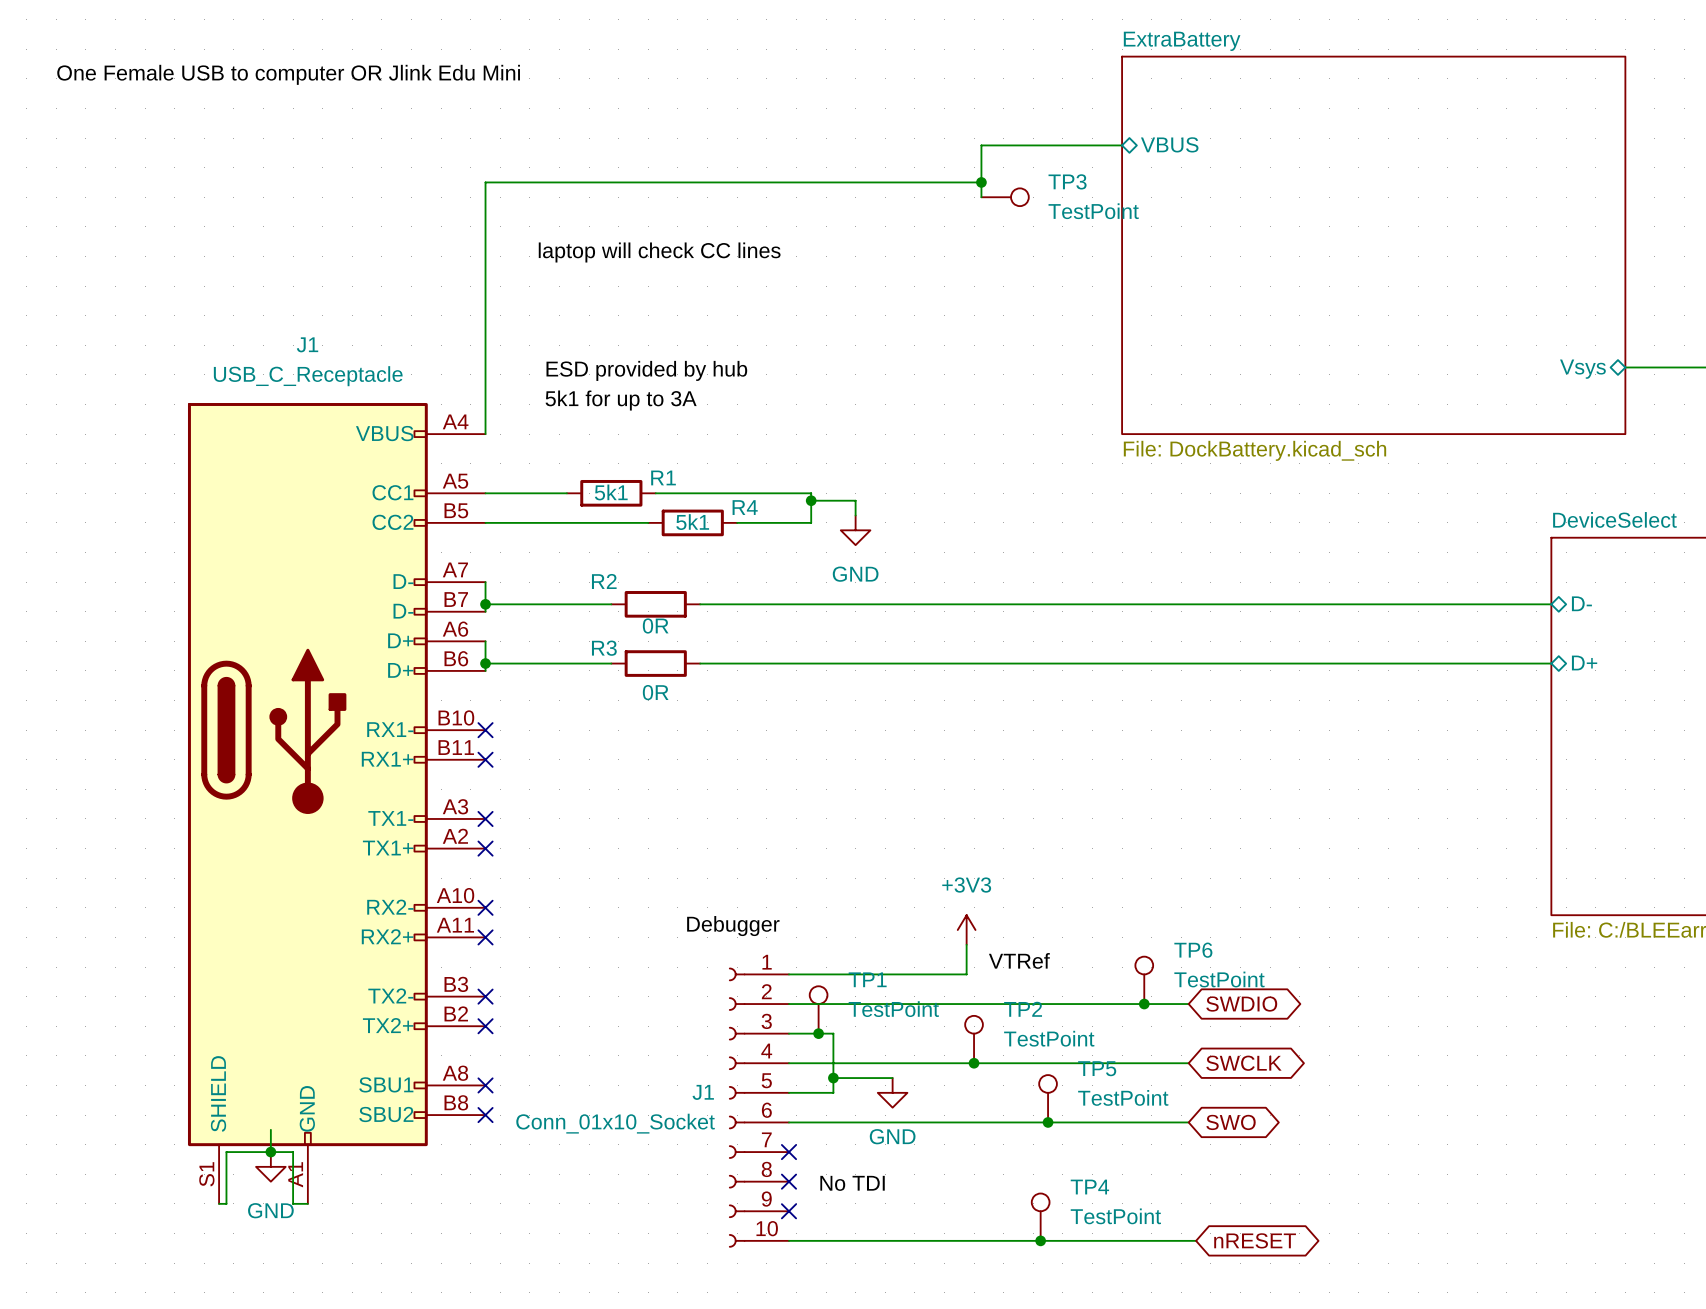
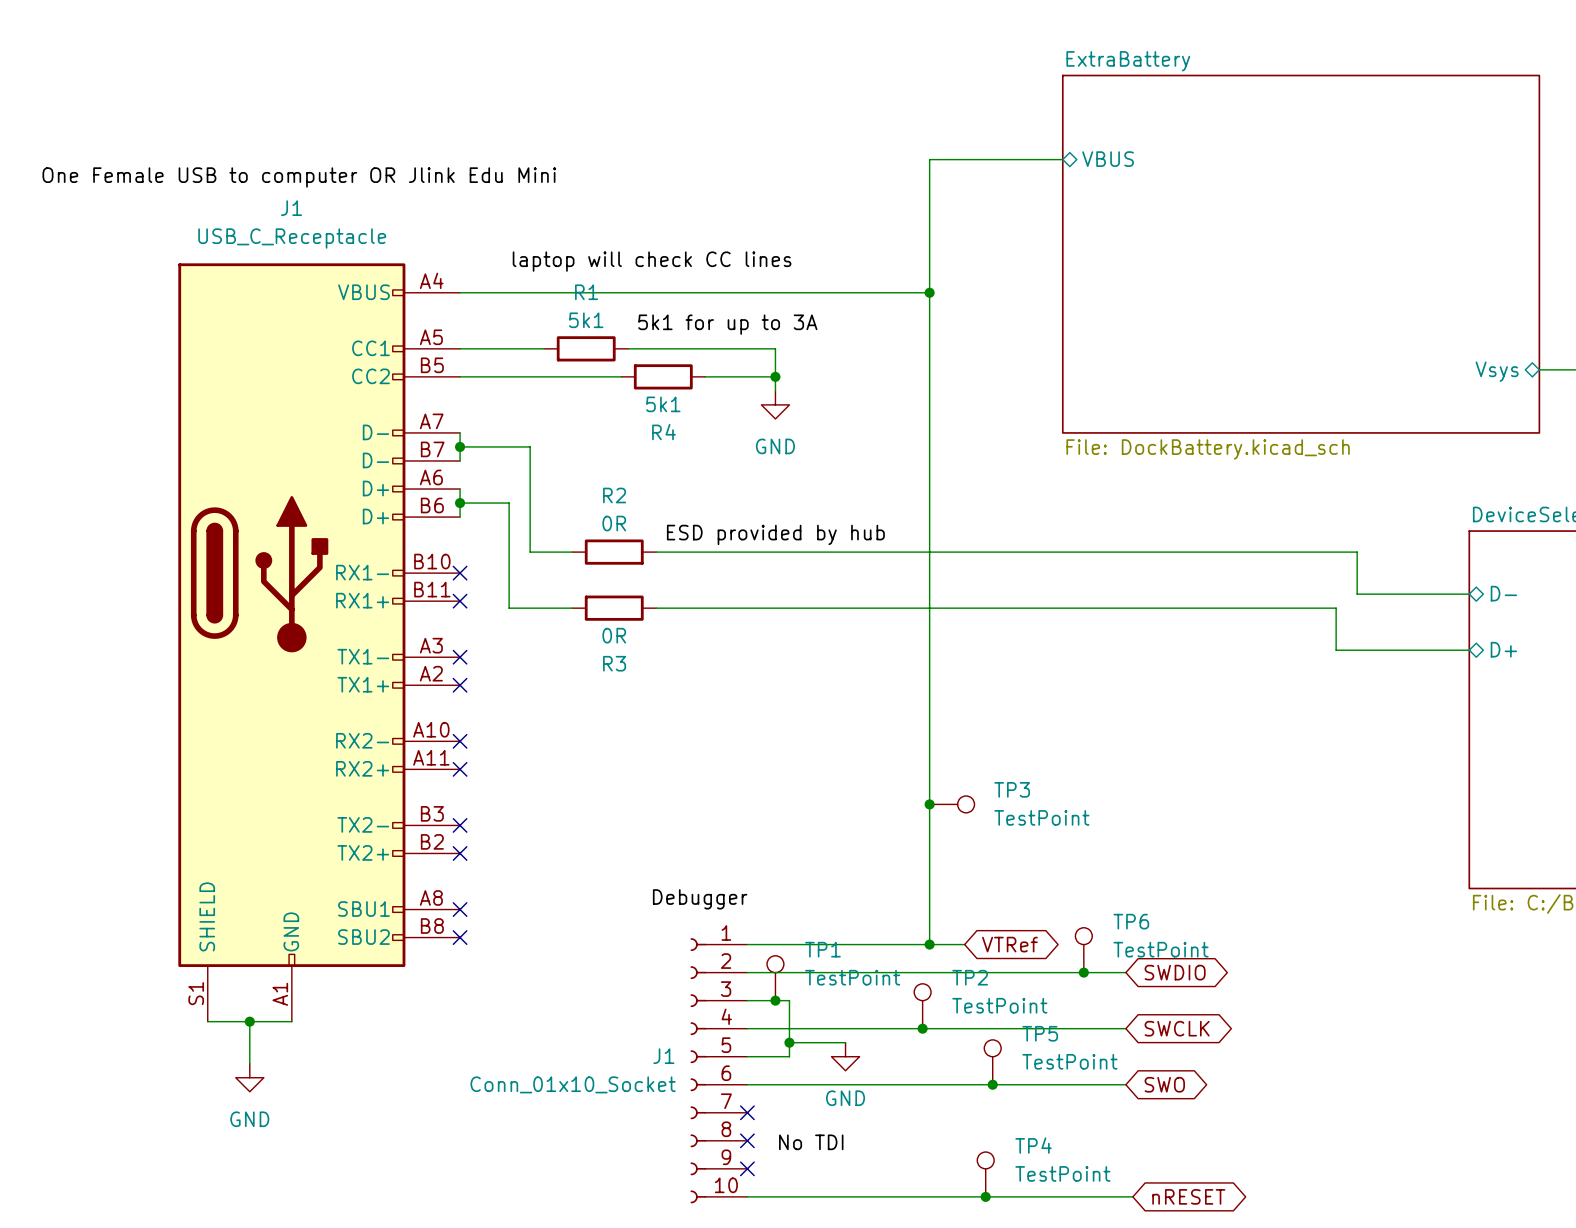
label position: One Female USB to computer OR Jlink Edu Mini (288, 74) -> One Female USB to computer OR Jlink Edu Mini (299, 177)
wire: (981, 182) (485, 182) (485, 434) -> (460, 460) (460, 432)
junction: (981, 182) -> none
wire: none -> (929, 208) (929, 944)
TP3 position: (1005, 197) -> (952, 804)
wire: none -> (460, 292) (929, 292)
junction: none -> (929, 292)
wire: none -> (460, 348) (544, 348)
wire: none -> (628, 348) (775, 348) (775, 390)
label position: ESD provided by hub (646, 370) -> ESD provided by hub (775, 534)
wire: none -> (460, 376) (621, 376)
wire: none -> (705, 376) (775, 376)
junction: none -> (775, 376)
label position: 5k1 for up to 3A (621, 400) -> 5k1 for up to 3A (727, 324)
wire: none -> (460, 446) (530, 446) (530, 552) (572, 552)
junction: none -> (460, 446)
R1 name position: R1 (663, 477) -> R1 (586, 292)
R1 value position: 5k1 (611, 492) -> 5k1 (586, 320)
wire: (485, 493) (566, 493) -> (460, 489) (460, 517)
R1 position: (611, 493) -> (586, 348)
wire: (655, 493) (811, 493) (811, 522) (737, 522) -> none
wire: (811, 500) (855, 500) (855, 515) -> none
junction: (811, 500) -> none
R4 name position: R4 (745, 507) -> R4 (663, 432)
wire: none -> (460, 503) (509, 503) (509, 608) (572, 608)
junction: none -> (460, 503)
wire: (485, 522) (648, 522) -> none
R4 position: (692, 522) -> (663, 376)
R4 value position: 5k1 (692, 522) -> 5k1 (663, 404)
power symbol position: GND (855, 530) -> GND (775, 404)
R2 name position: R2 (604, 581) -> R2 (614, 495)
wire: (485, 582) (485, 611) -> none
no-connect mark: none -> (460, 573)
wire: (485, 604) (611, 604) -> none
junction: (485, 604) -> none
R2 position: (655, 604) -> (614, 552)
wire: (700, 604) (1432, 604) -> (656, 552) (1357, 552) (1357, 594)
no-connect mark: none -> (460, 601)
R2 value position: 0R (655, 625) -> 0R (614, 523)
wire: (485, 641) (485, 670) -> none
R3 name position: R3 (604, 648) -> R3 (614, 663)
wire: (485, 663) (611, 663) -> none
junction: (485, 663) -> none
R3 position: (655, 663) -> (614, 608)
wire: (700, 663) (1410, 663) -> (656, 608) (1336, 608) (1336, 650)
no-connect mark: none -> (460, 657)
no-connect mark: none -> (460, 685)
no-connect mark: (485, 730) -> none
no-connect mark: none -> (460, 769)
J1 position: (336, 803) -> (319, 642)
no-connect mark: (485, 818) -> none
junction: none -> (929, 804)
no-connect mark: none -> (460, 853)
no-connect mark: (485, 907) -> none
power symbol: +3V3 (966, 930) -> none
wire: (966, 944) (966, 974) -> (964, 944) (915, 944)
label: VTRef (1019, 960) -> none
no-connect mark: none -> (460, 937)
junction: none -> (929, 944)
global label: none -> VTRef (1009, 944)
no-connect mark: (485, 996) -> none
no-connect mark: (485, 1026) -> none
junction: none -> (249, 1021)
no-connect mark: (485, 1085) -> none
no-connect mark: (485, 1115) -> none
wire: (270, 1129) (270, 1152) -> none
junction: (270, 1152) -> none
power symbol position: GND (270, 1166) -> GND (249, 1077)
wire: (219, 1203) (226, 1203) (226, 1152) (293, 1152) (293, 1203) (307, 1203) -> none

